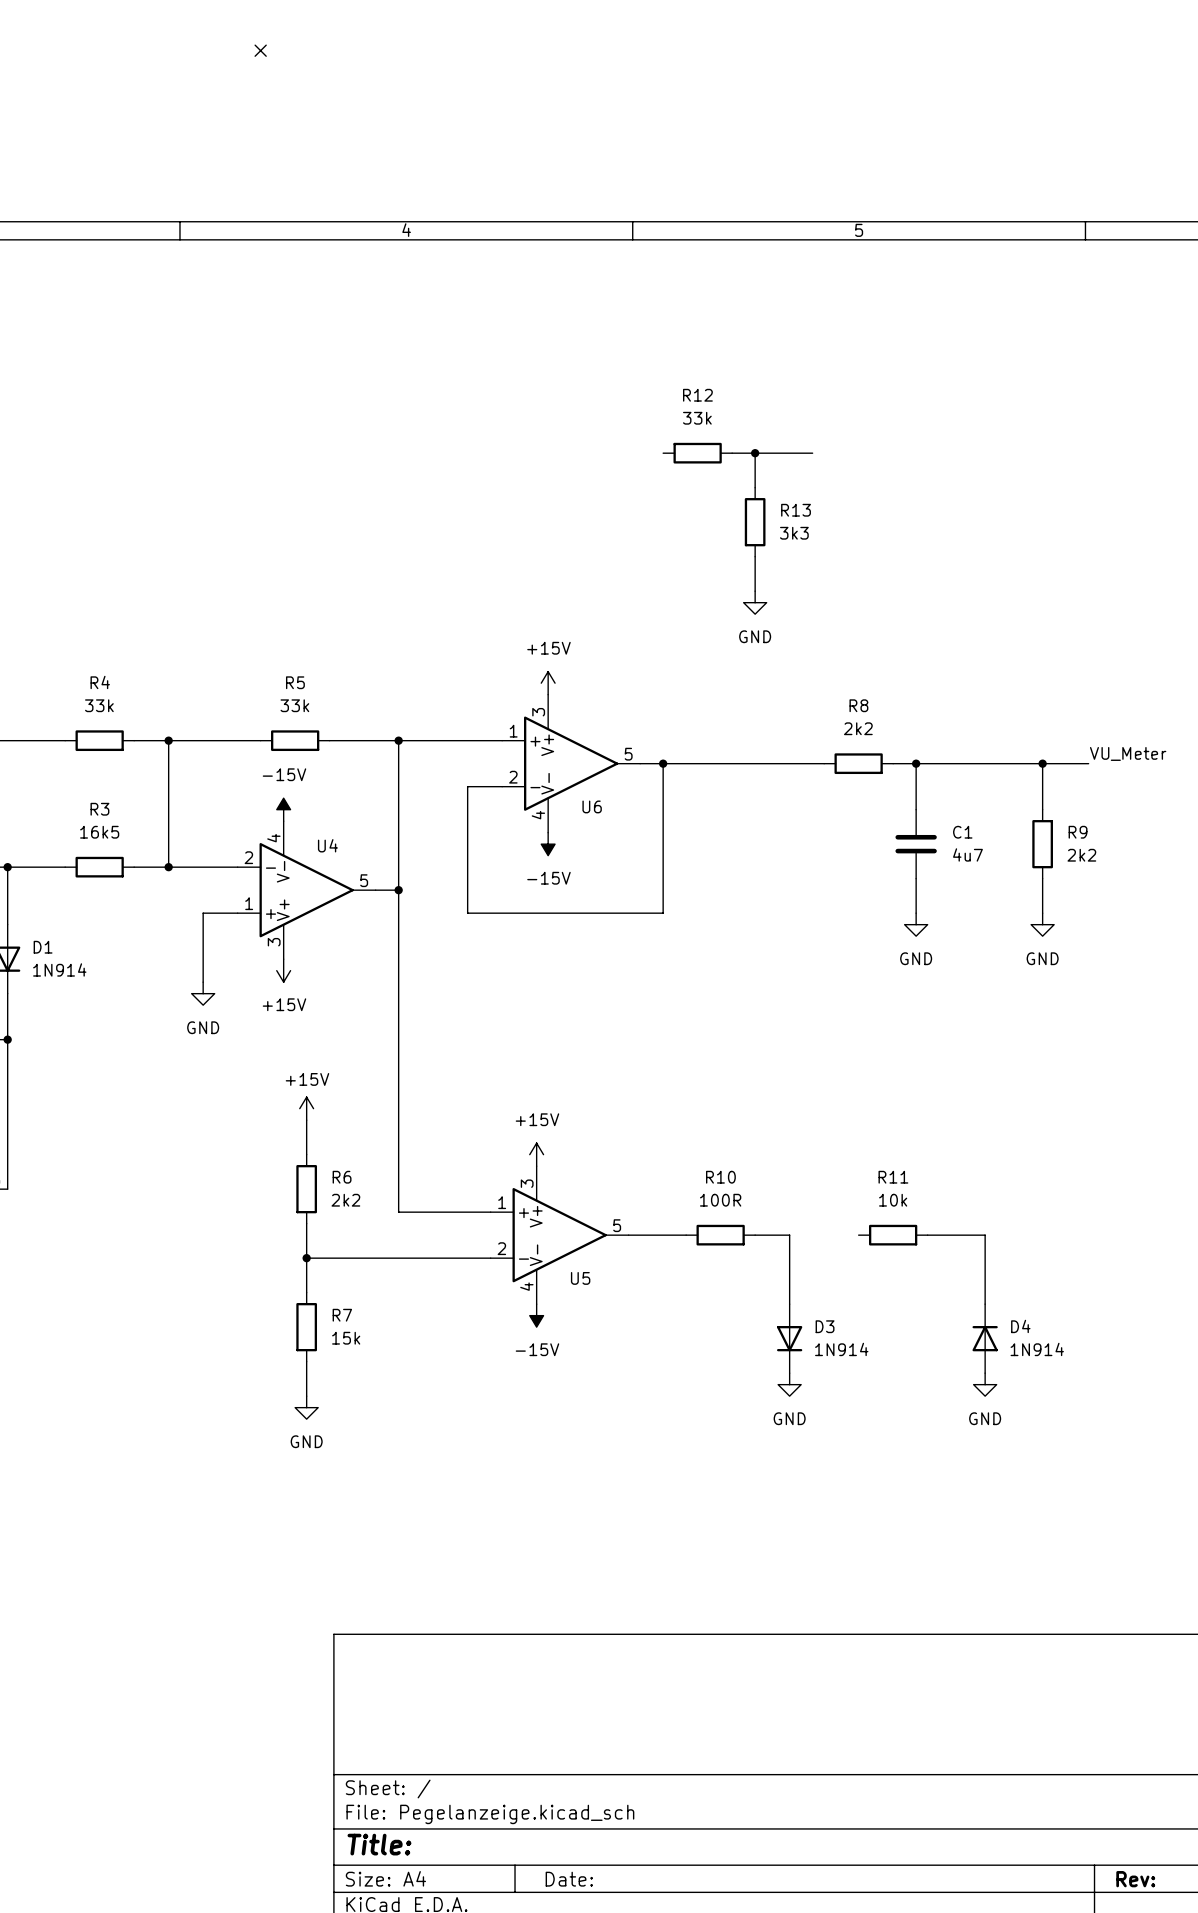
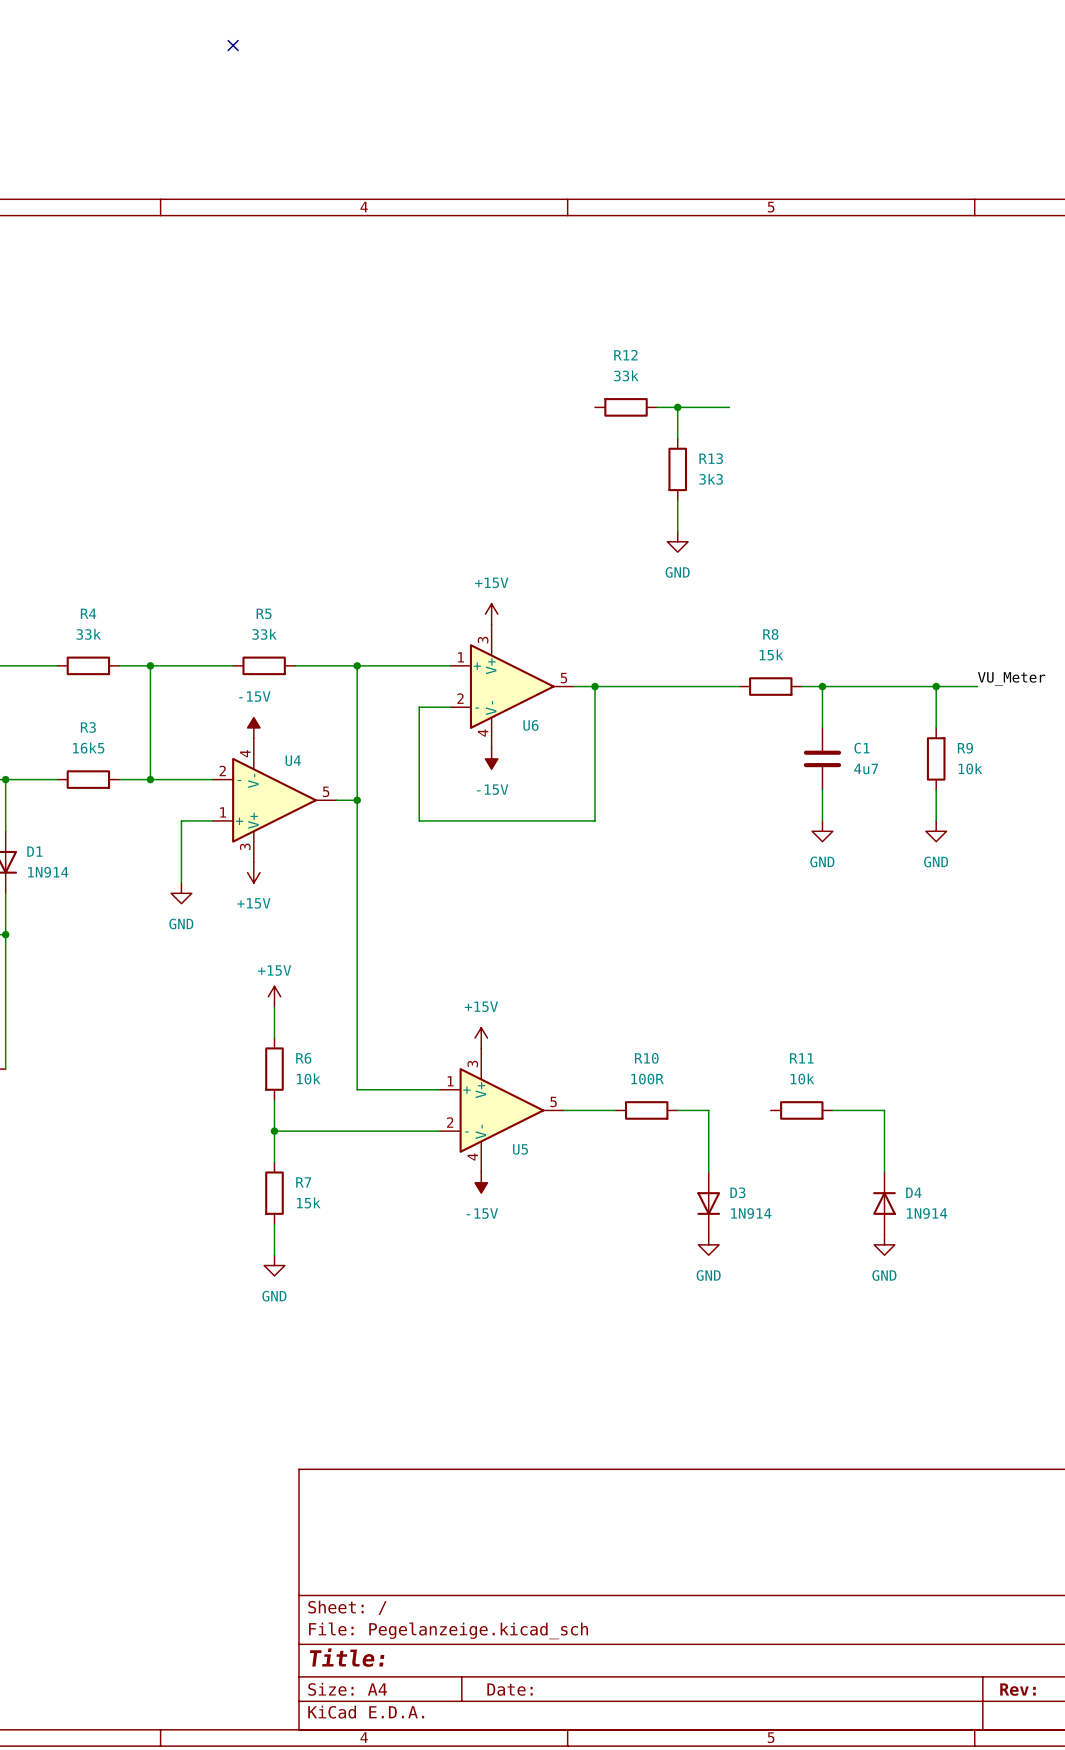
R8 value: 2k2 (858, 728) -> 15k (771, 655)
R9 value: 2k2 (1081, 855) -> 10k (970, 768)
R6 value: 2k2 (345, 1200) -> 10k (308, 1078)

